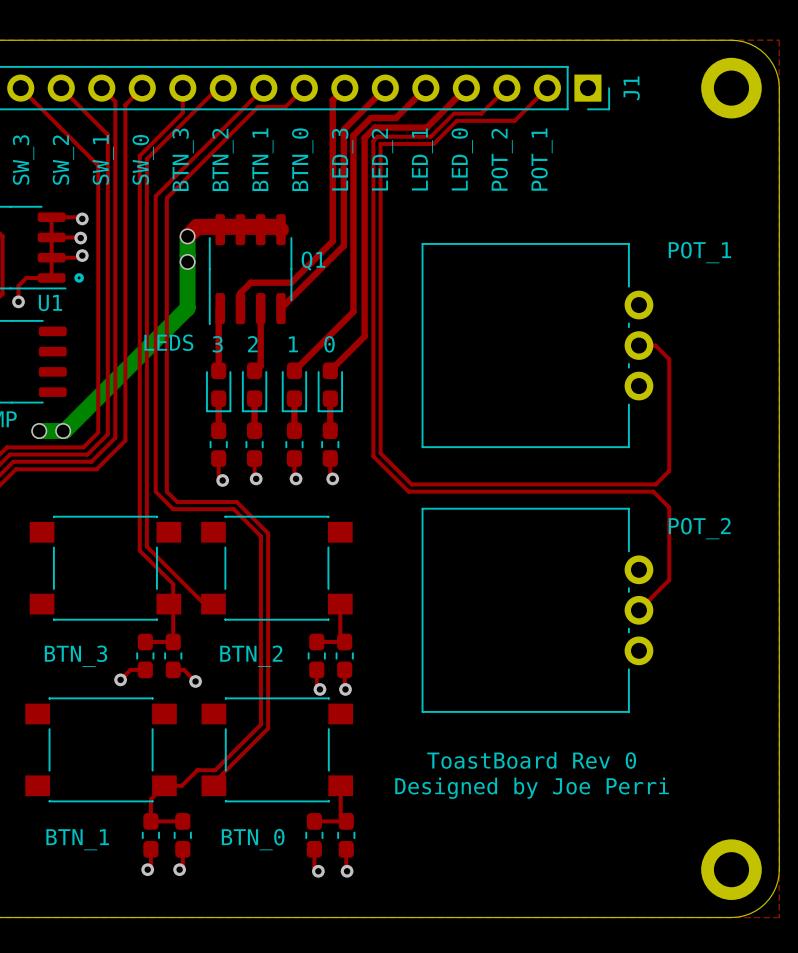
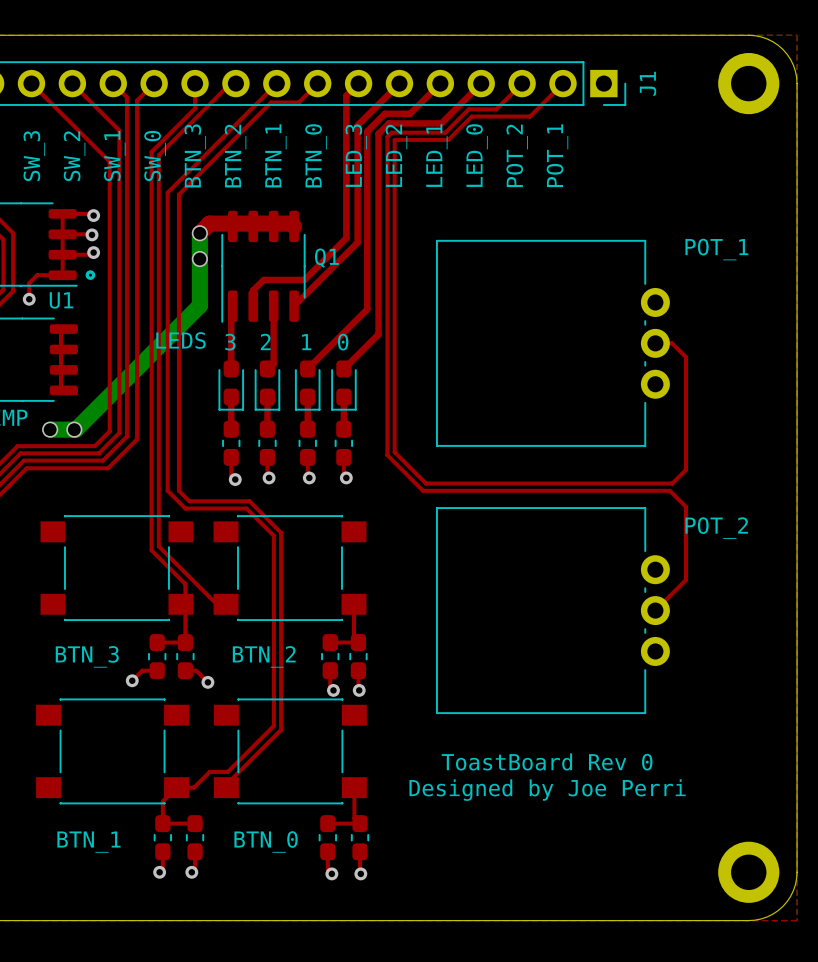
top track: none -> (61, 326) (61, 387)

